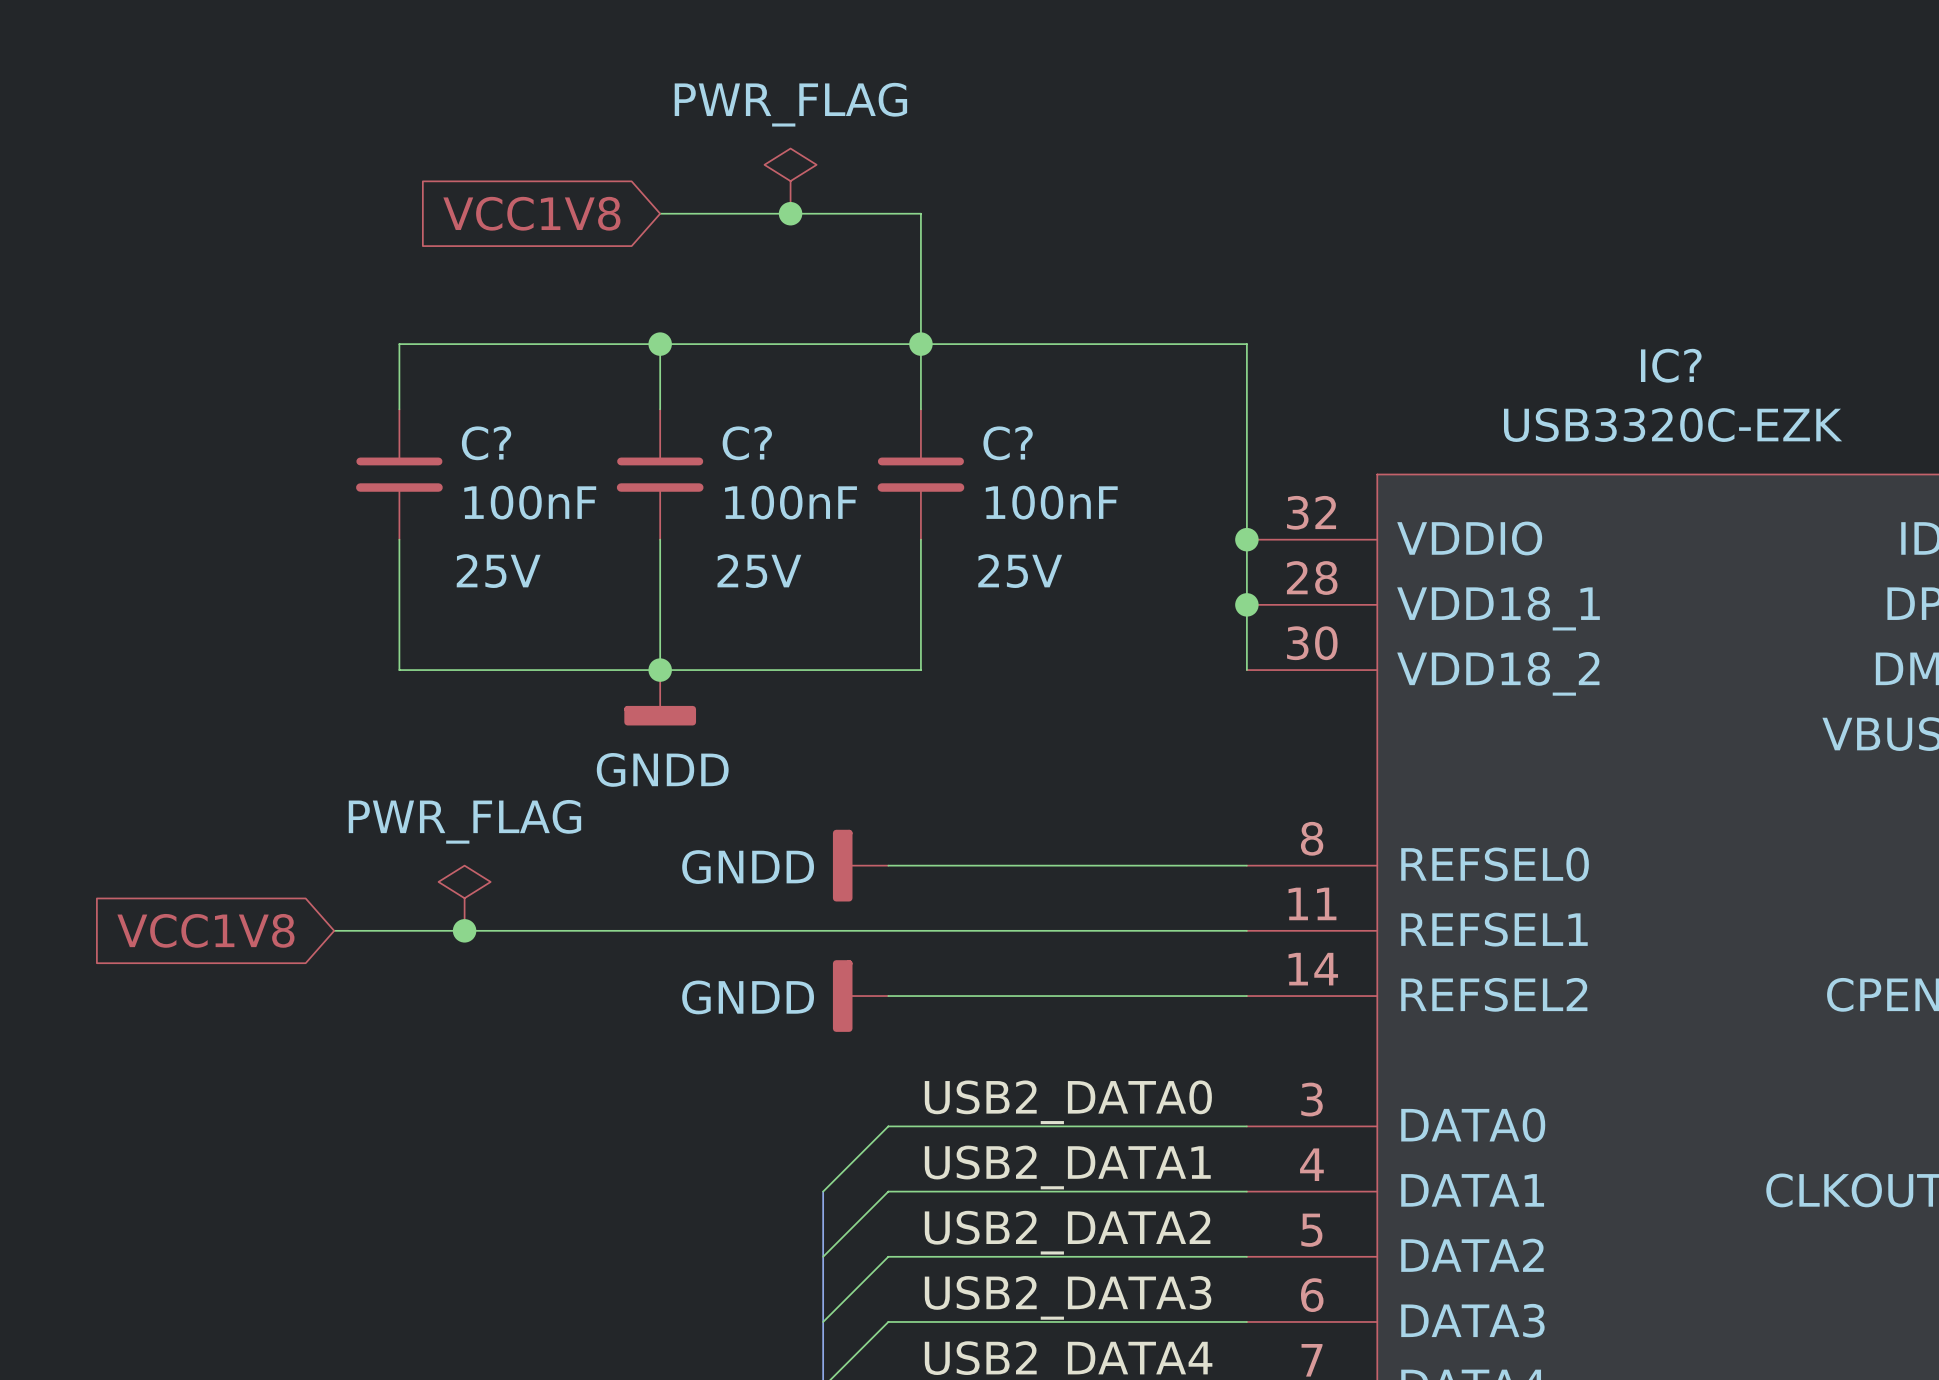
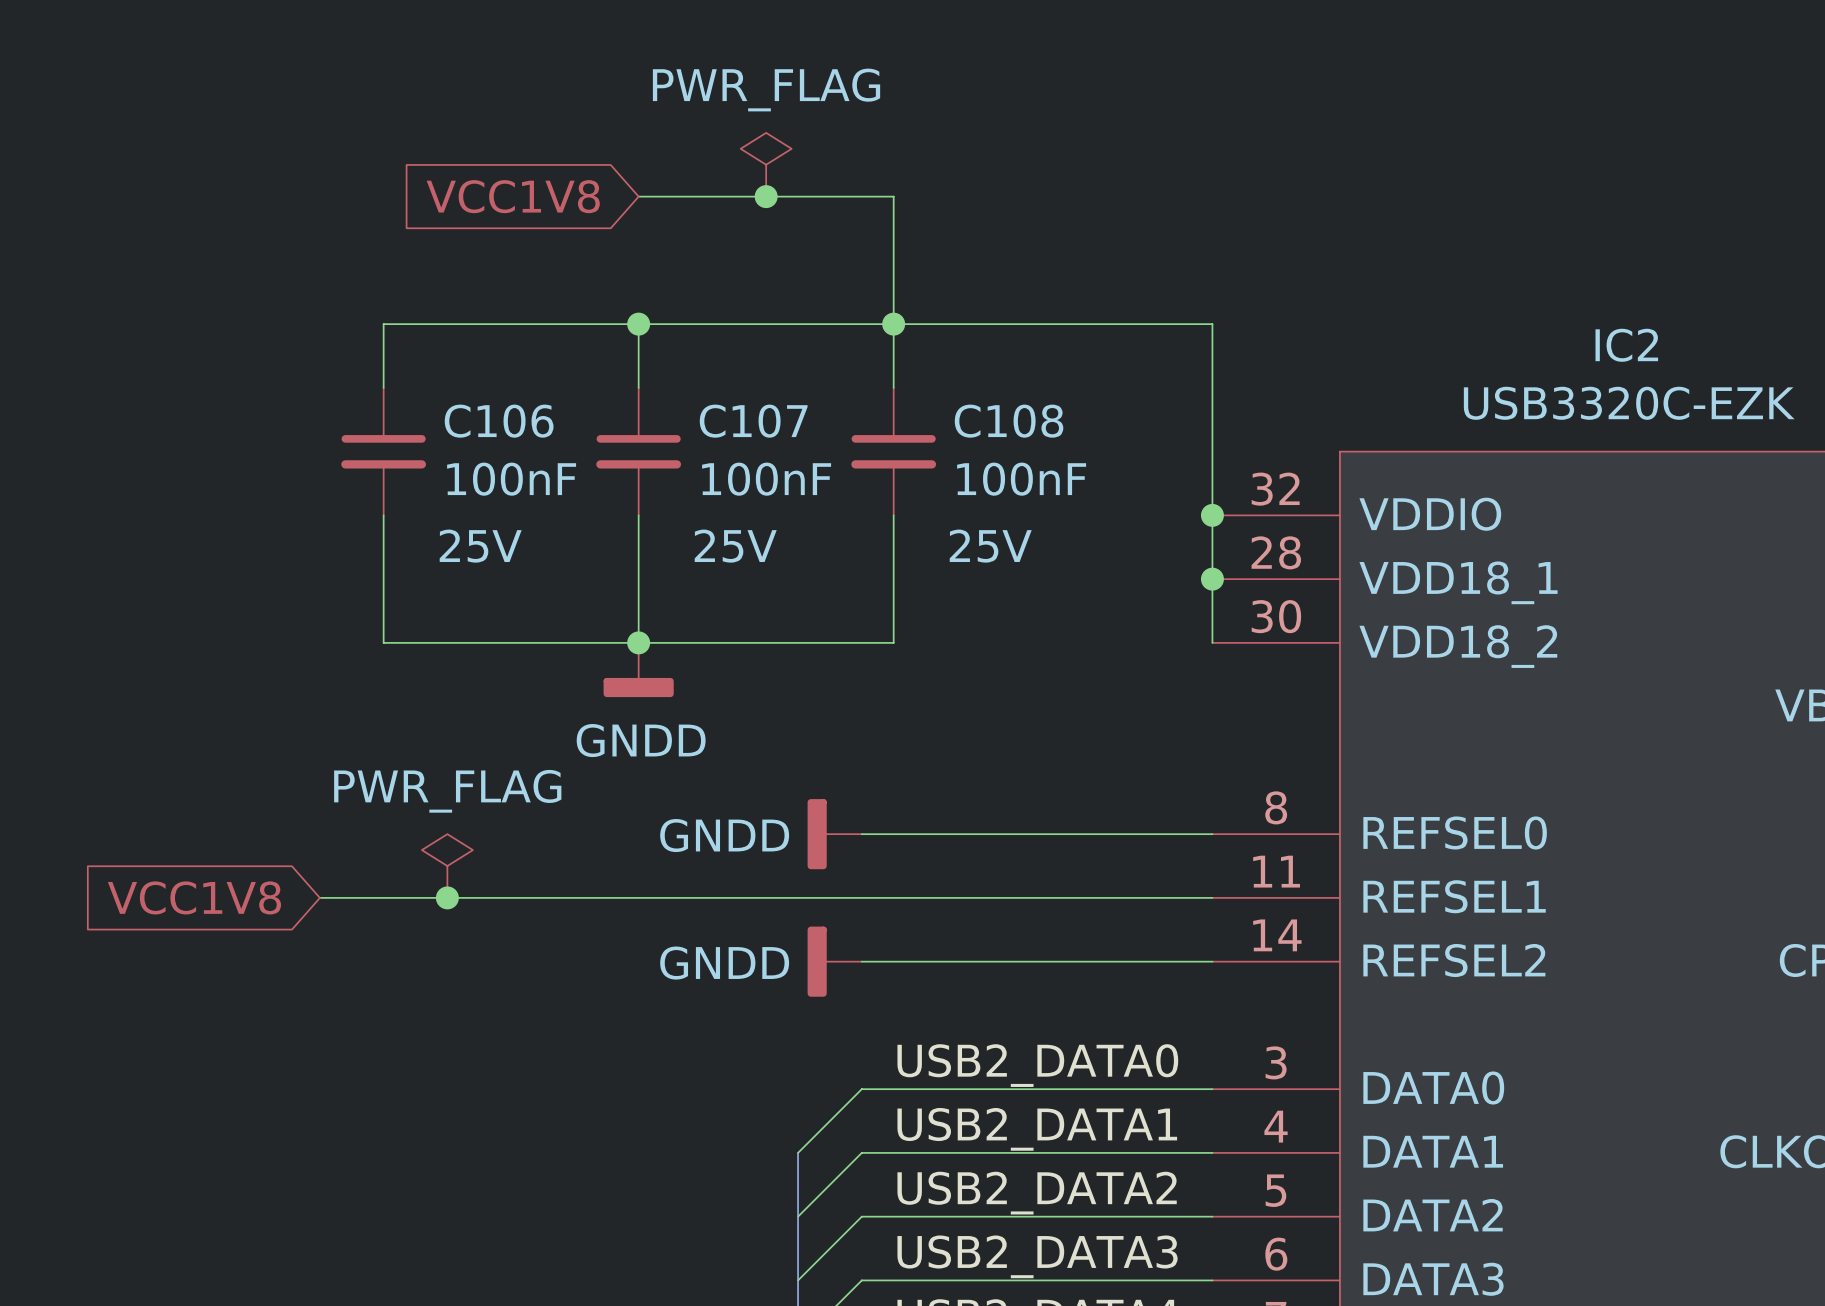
IC? name: IC? (1671, 365) -> IC2 (1626, 345)
C? name: C? (486, 443) -> C106 (499, 421)
C? name: C? (747, 443) -> C107 (753, 421)
C? name: C? (1008, 443) -> C108 (1009, 421)

